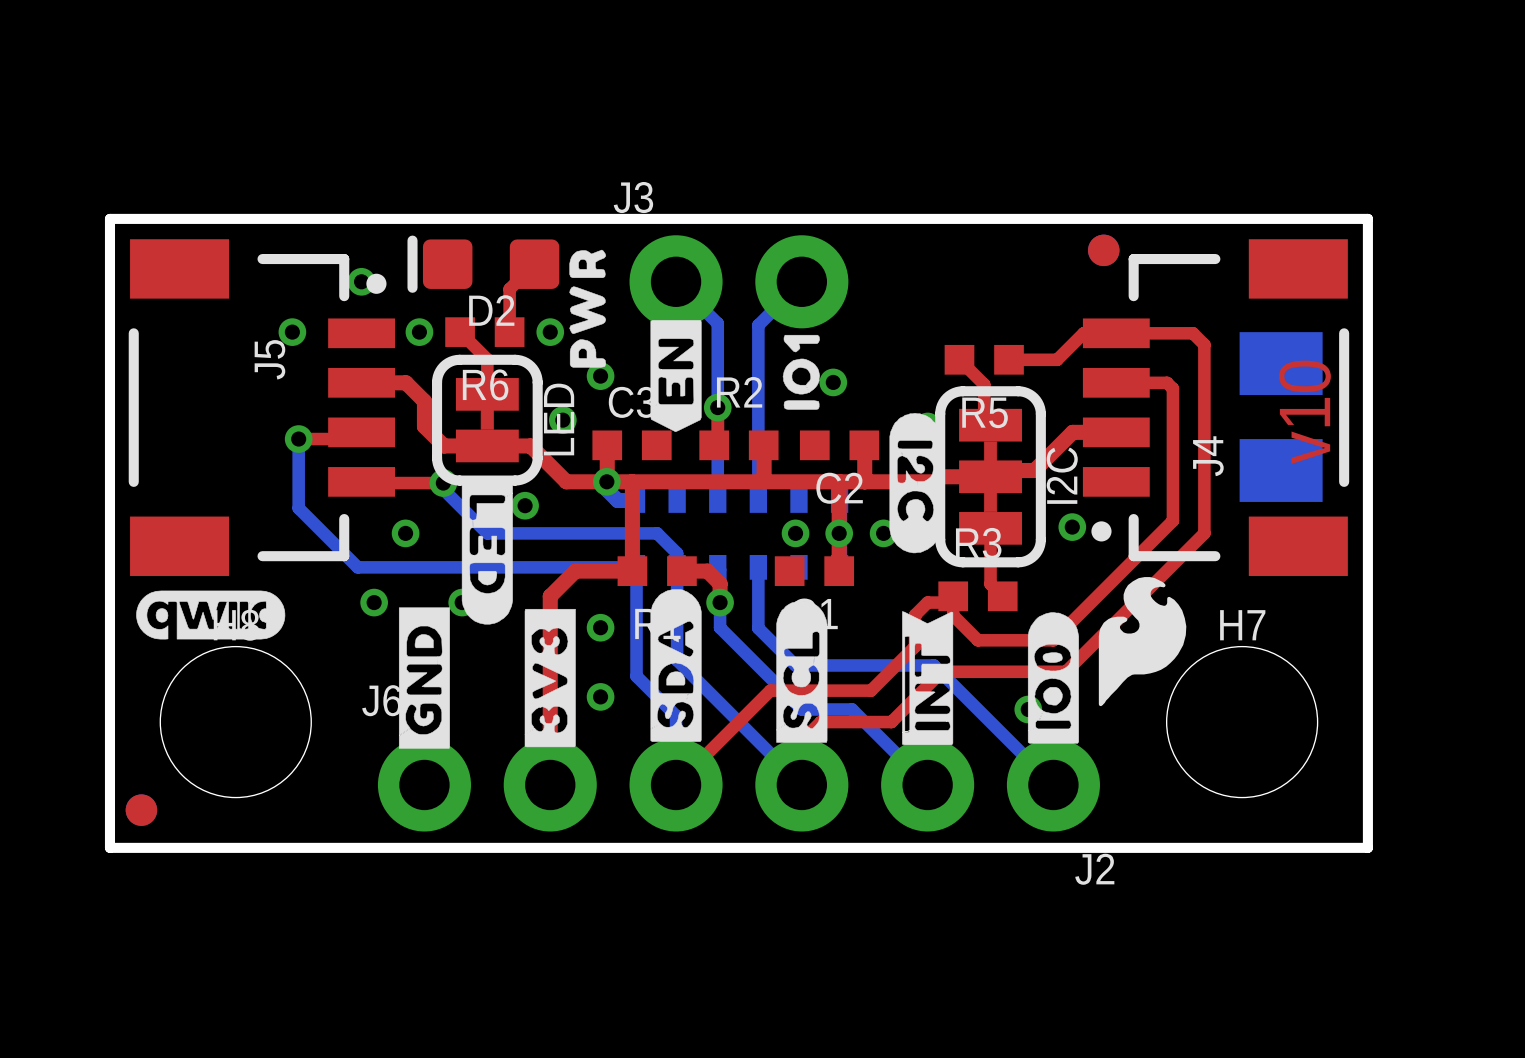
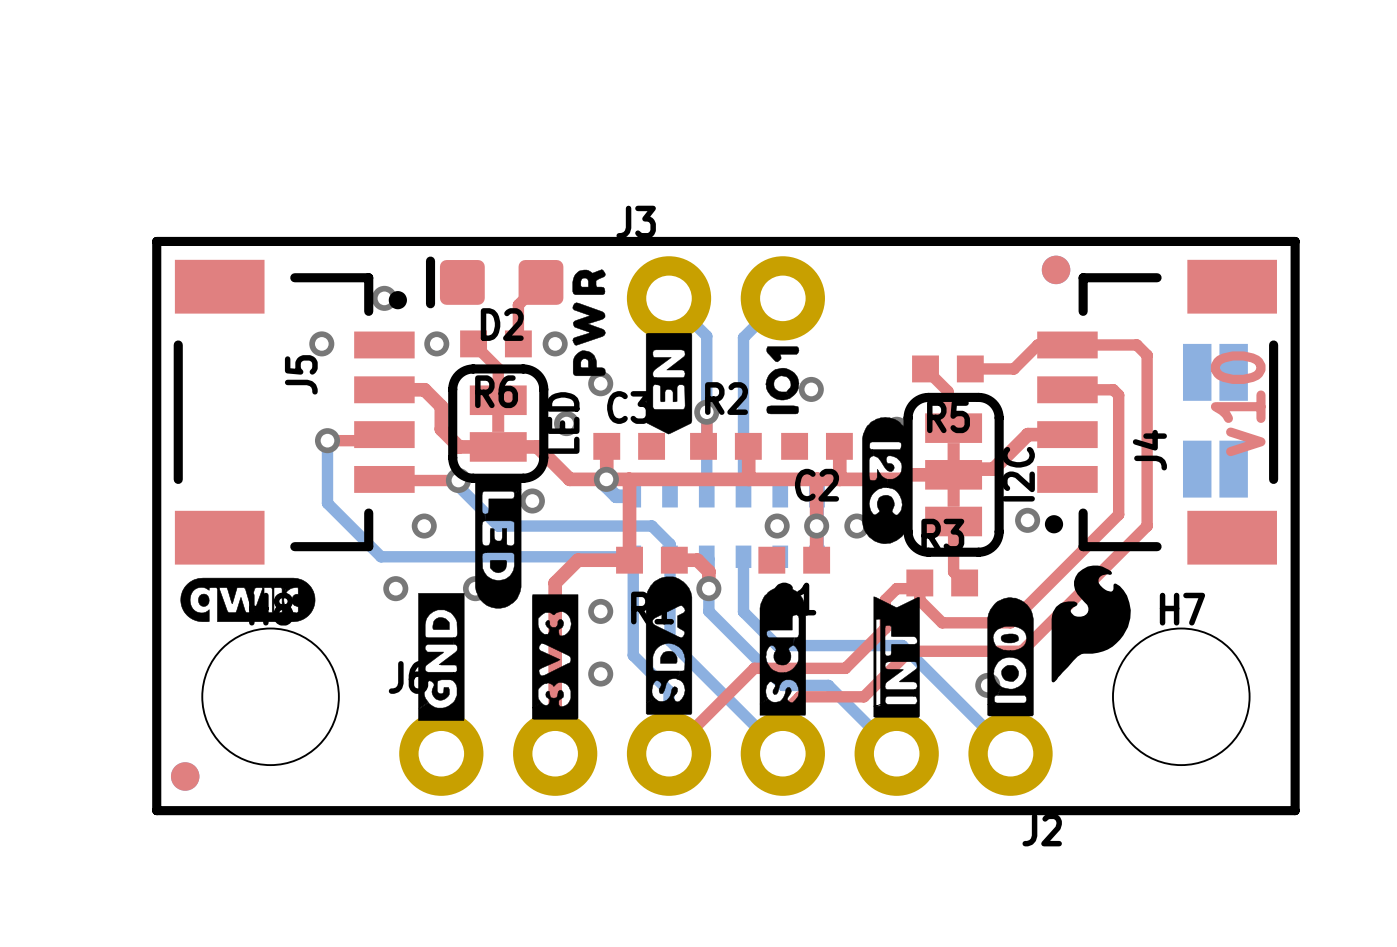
part footprint: [1239, 332, 1323, 396] -> [1182, 343, 1248, 401]
part footprint: [1239, 439, 1323, 502] -> [1182, 440, 1248, 498]

